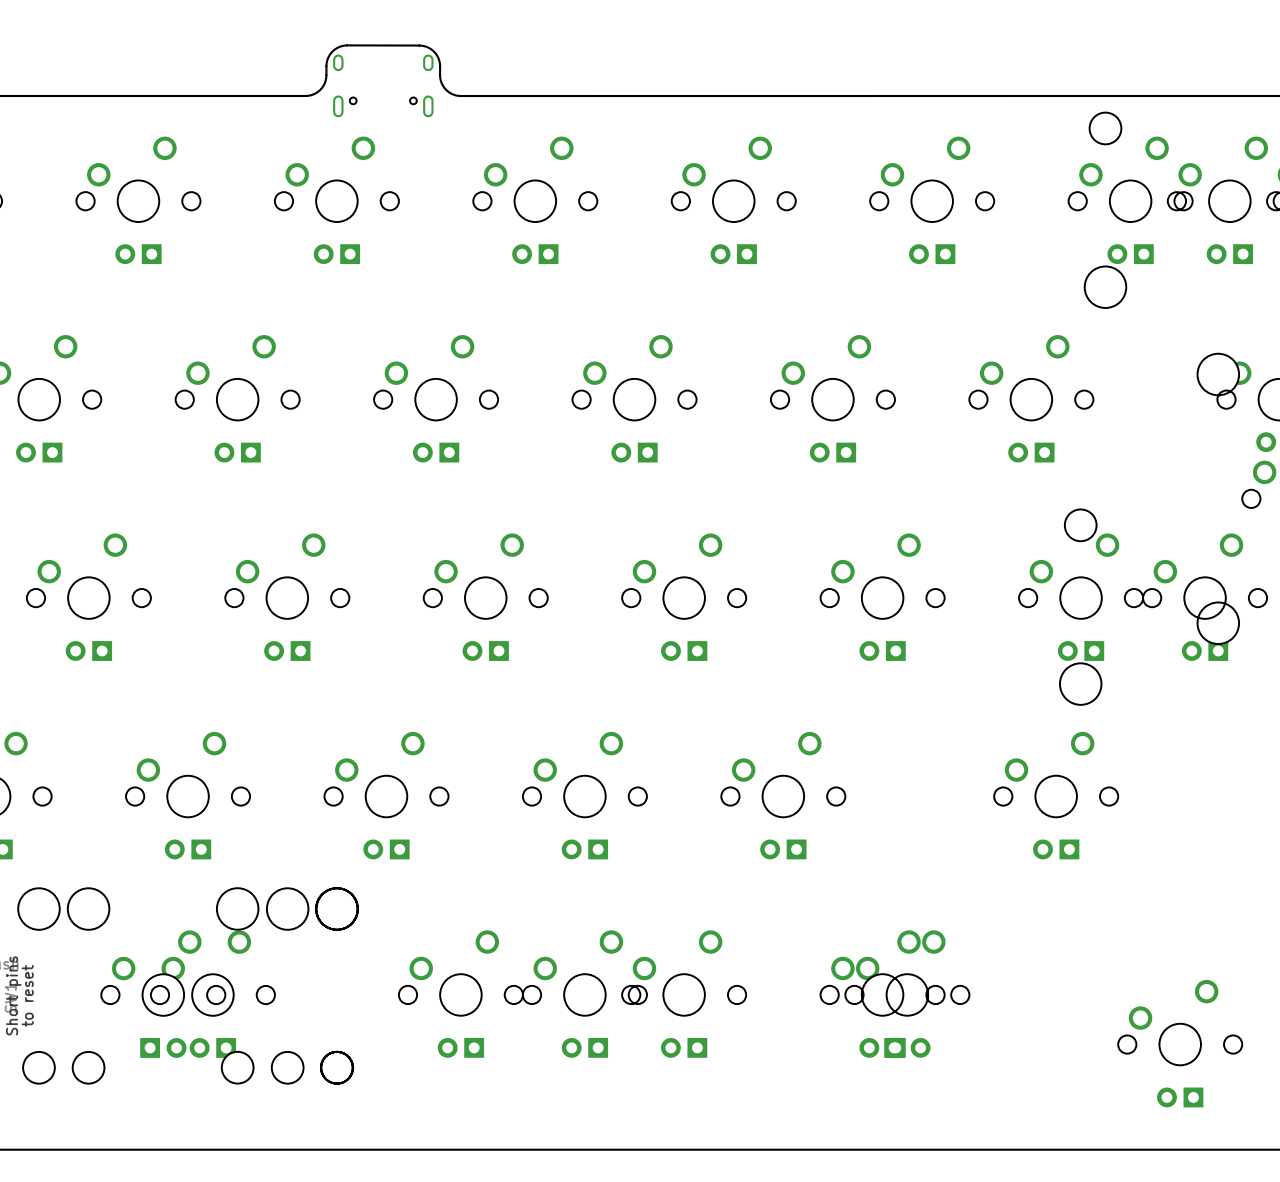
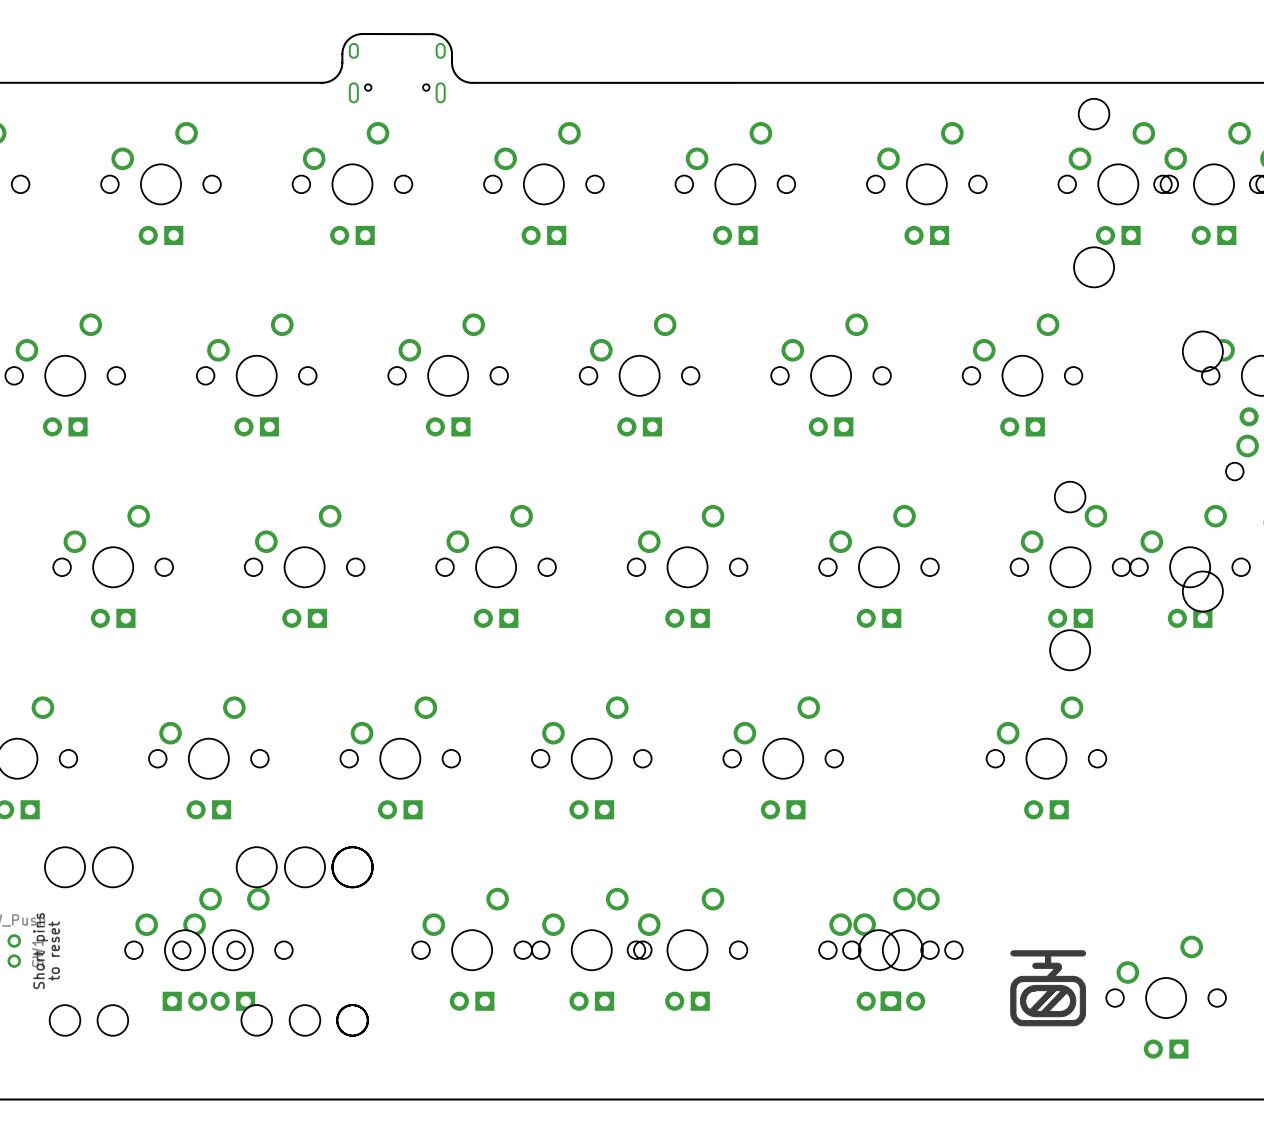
drawing: none -> [1010, 950, 1087, 1027]

